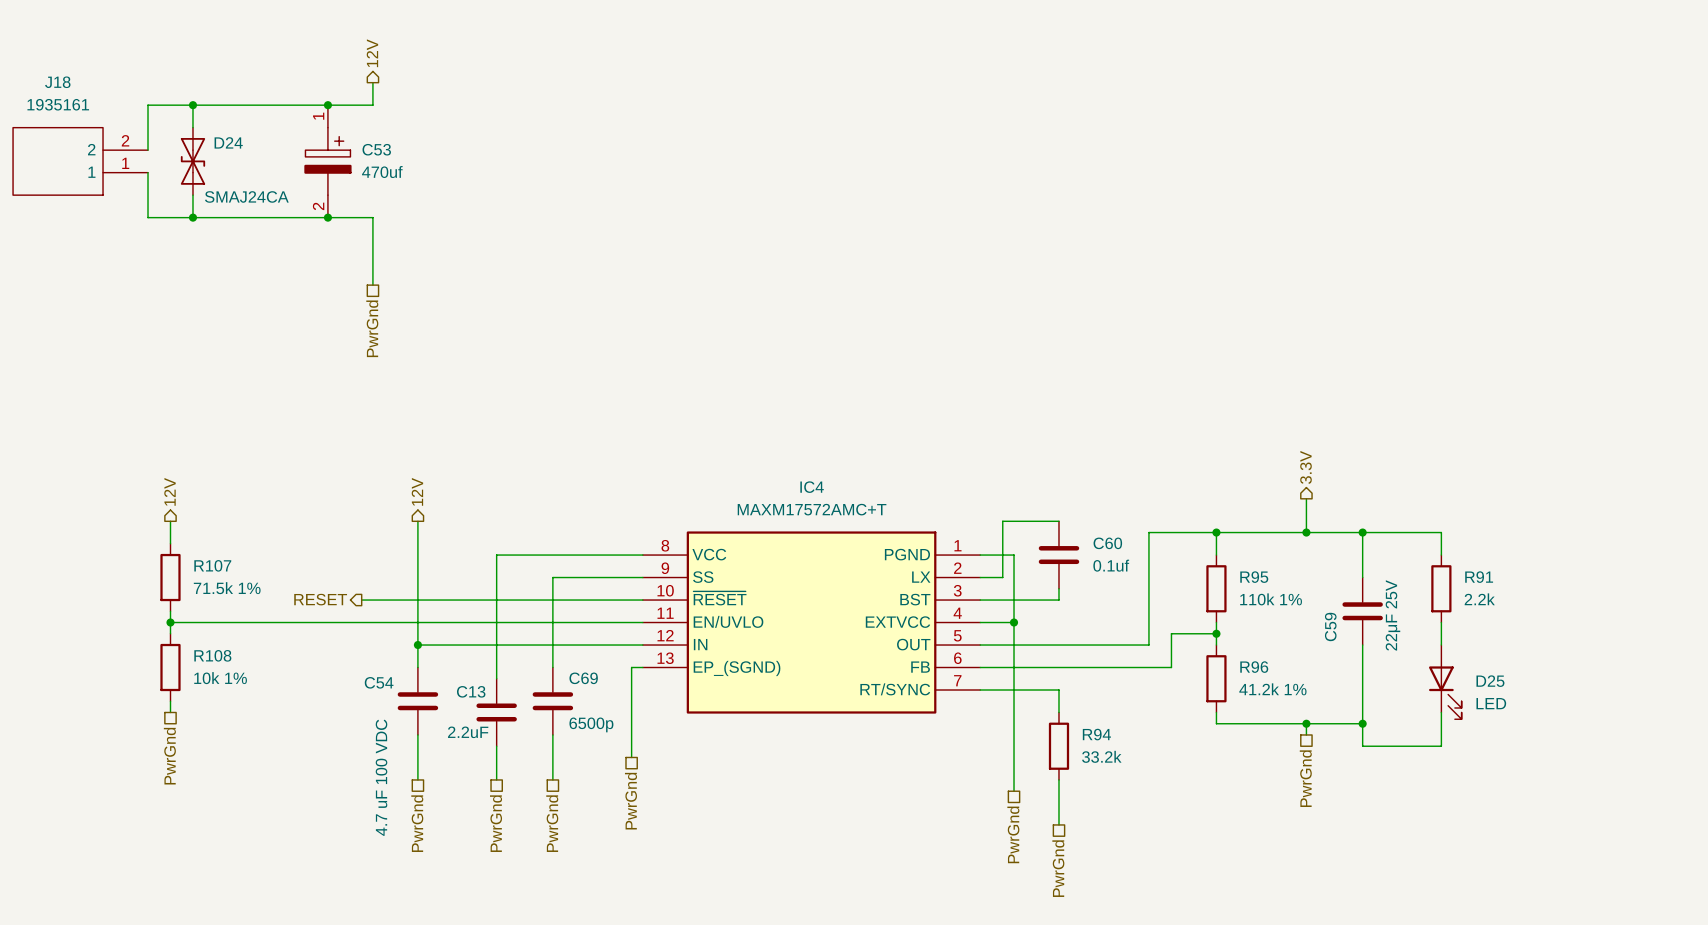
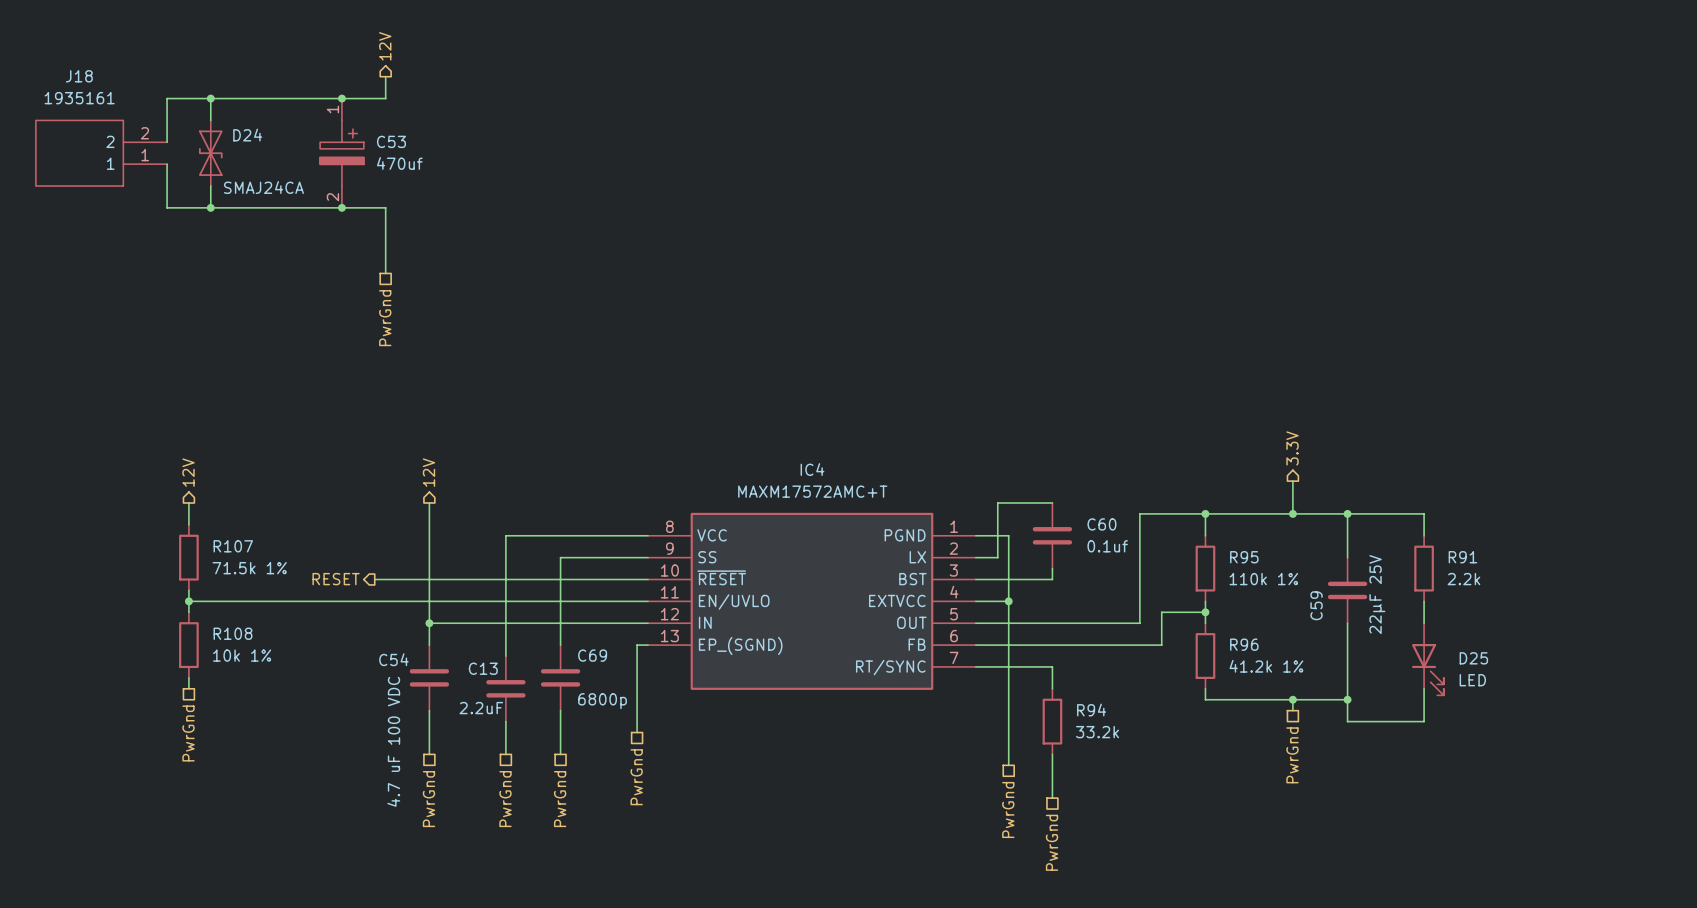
C69 value: 6500p (591, 724) -> 6800p (602, 701)

